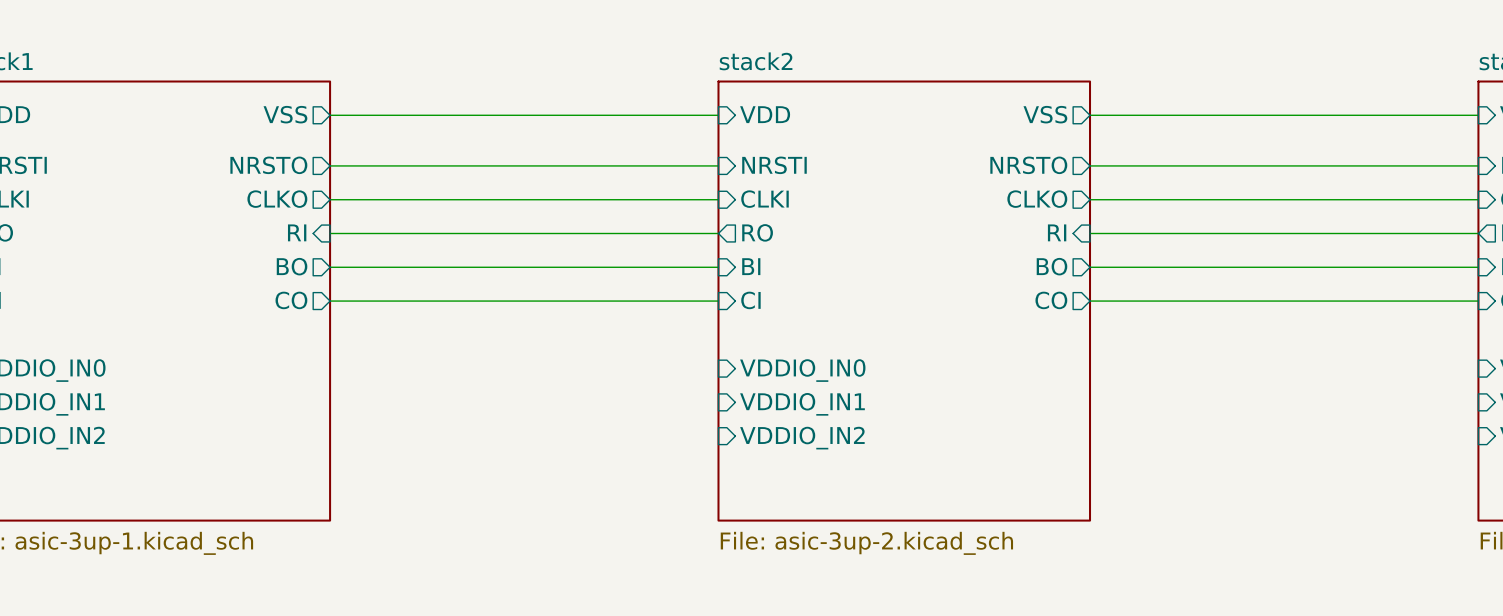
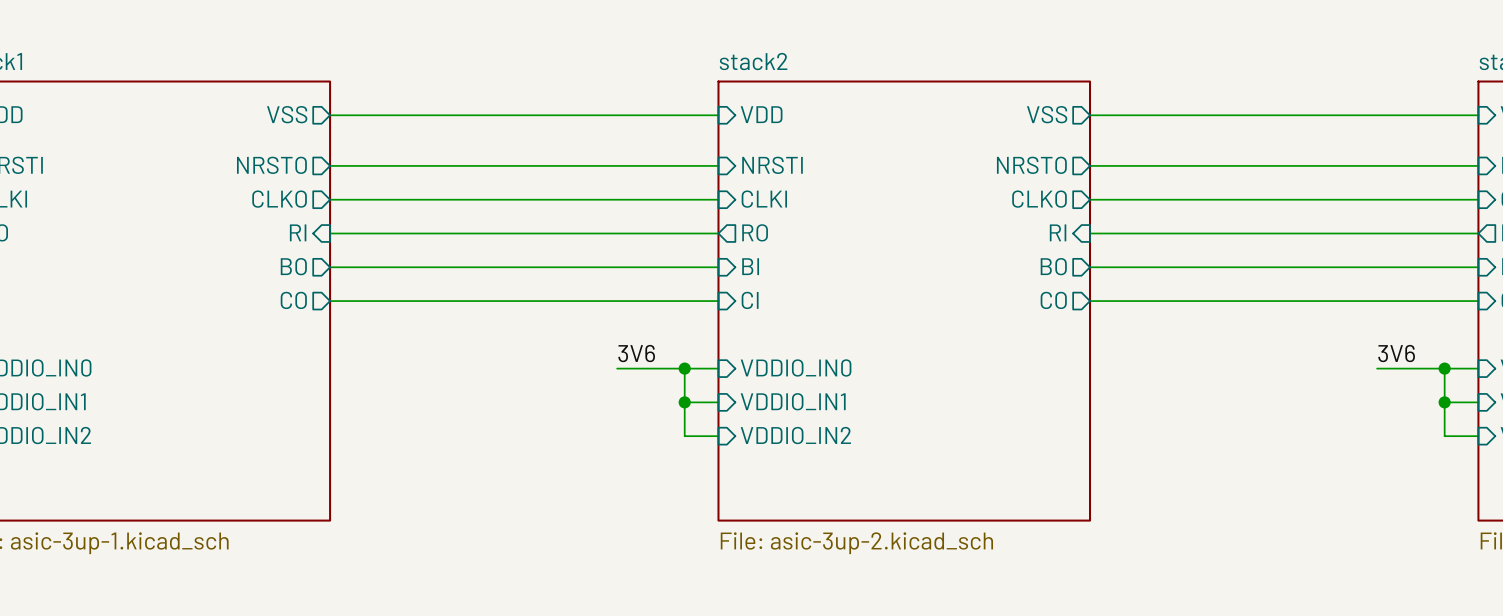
label: none -> 3V6 (636, 353)
label: none -> 3V6 (1396, 353)
wire: none -> (617, 368) (718, 368)
wire: none -> (684, 368) (684, 436) (718, 436)
junction: none -> (684, 368)
wire: none -> (1377, 368) (1478, 368)
wire: none -> (1444, 368) (1444, 436) (1478, 436)
junction: none -> (1444, 368)
wire: none -> (684, 402) (718, 402)
junction: none -> (684, 402)
wire: none -> (1444, 402) (1478, 402)
junction: none -> (1444, 402)

